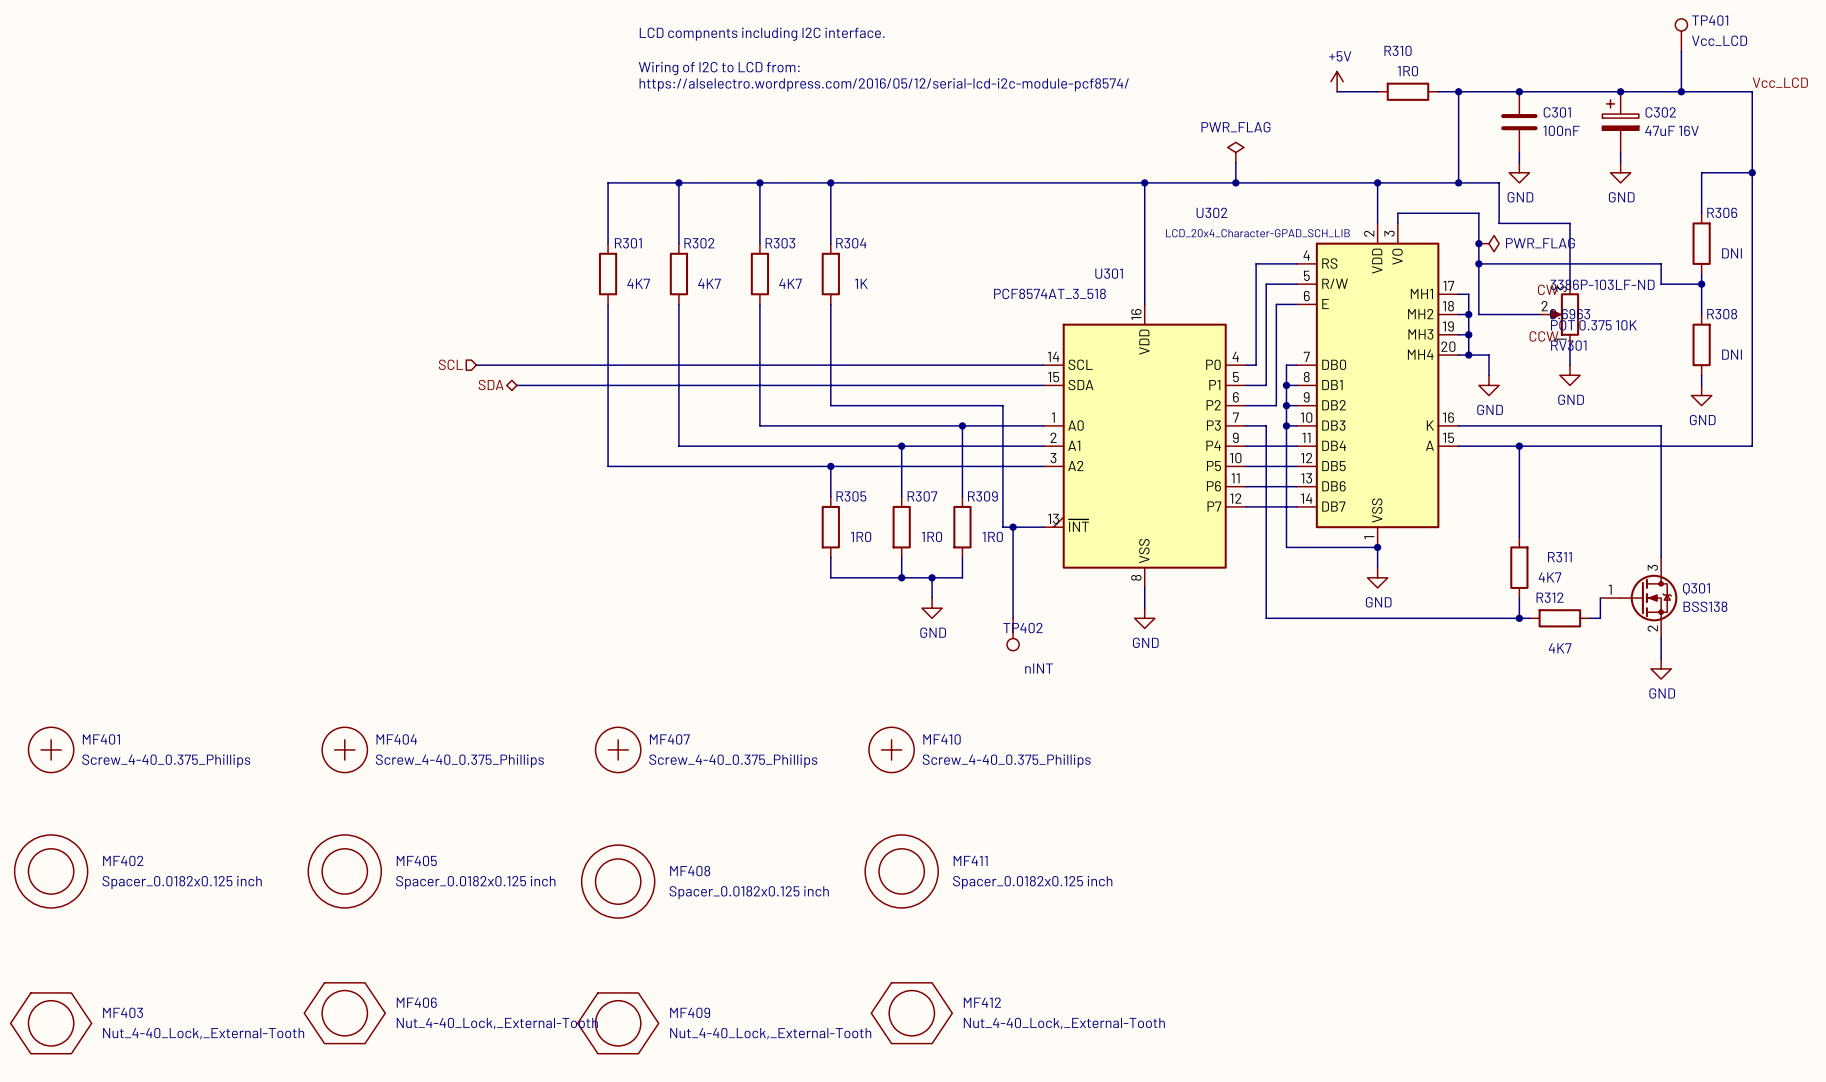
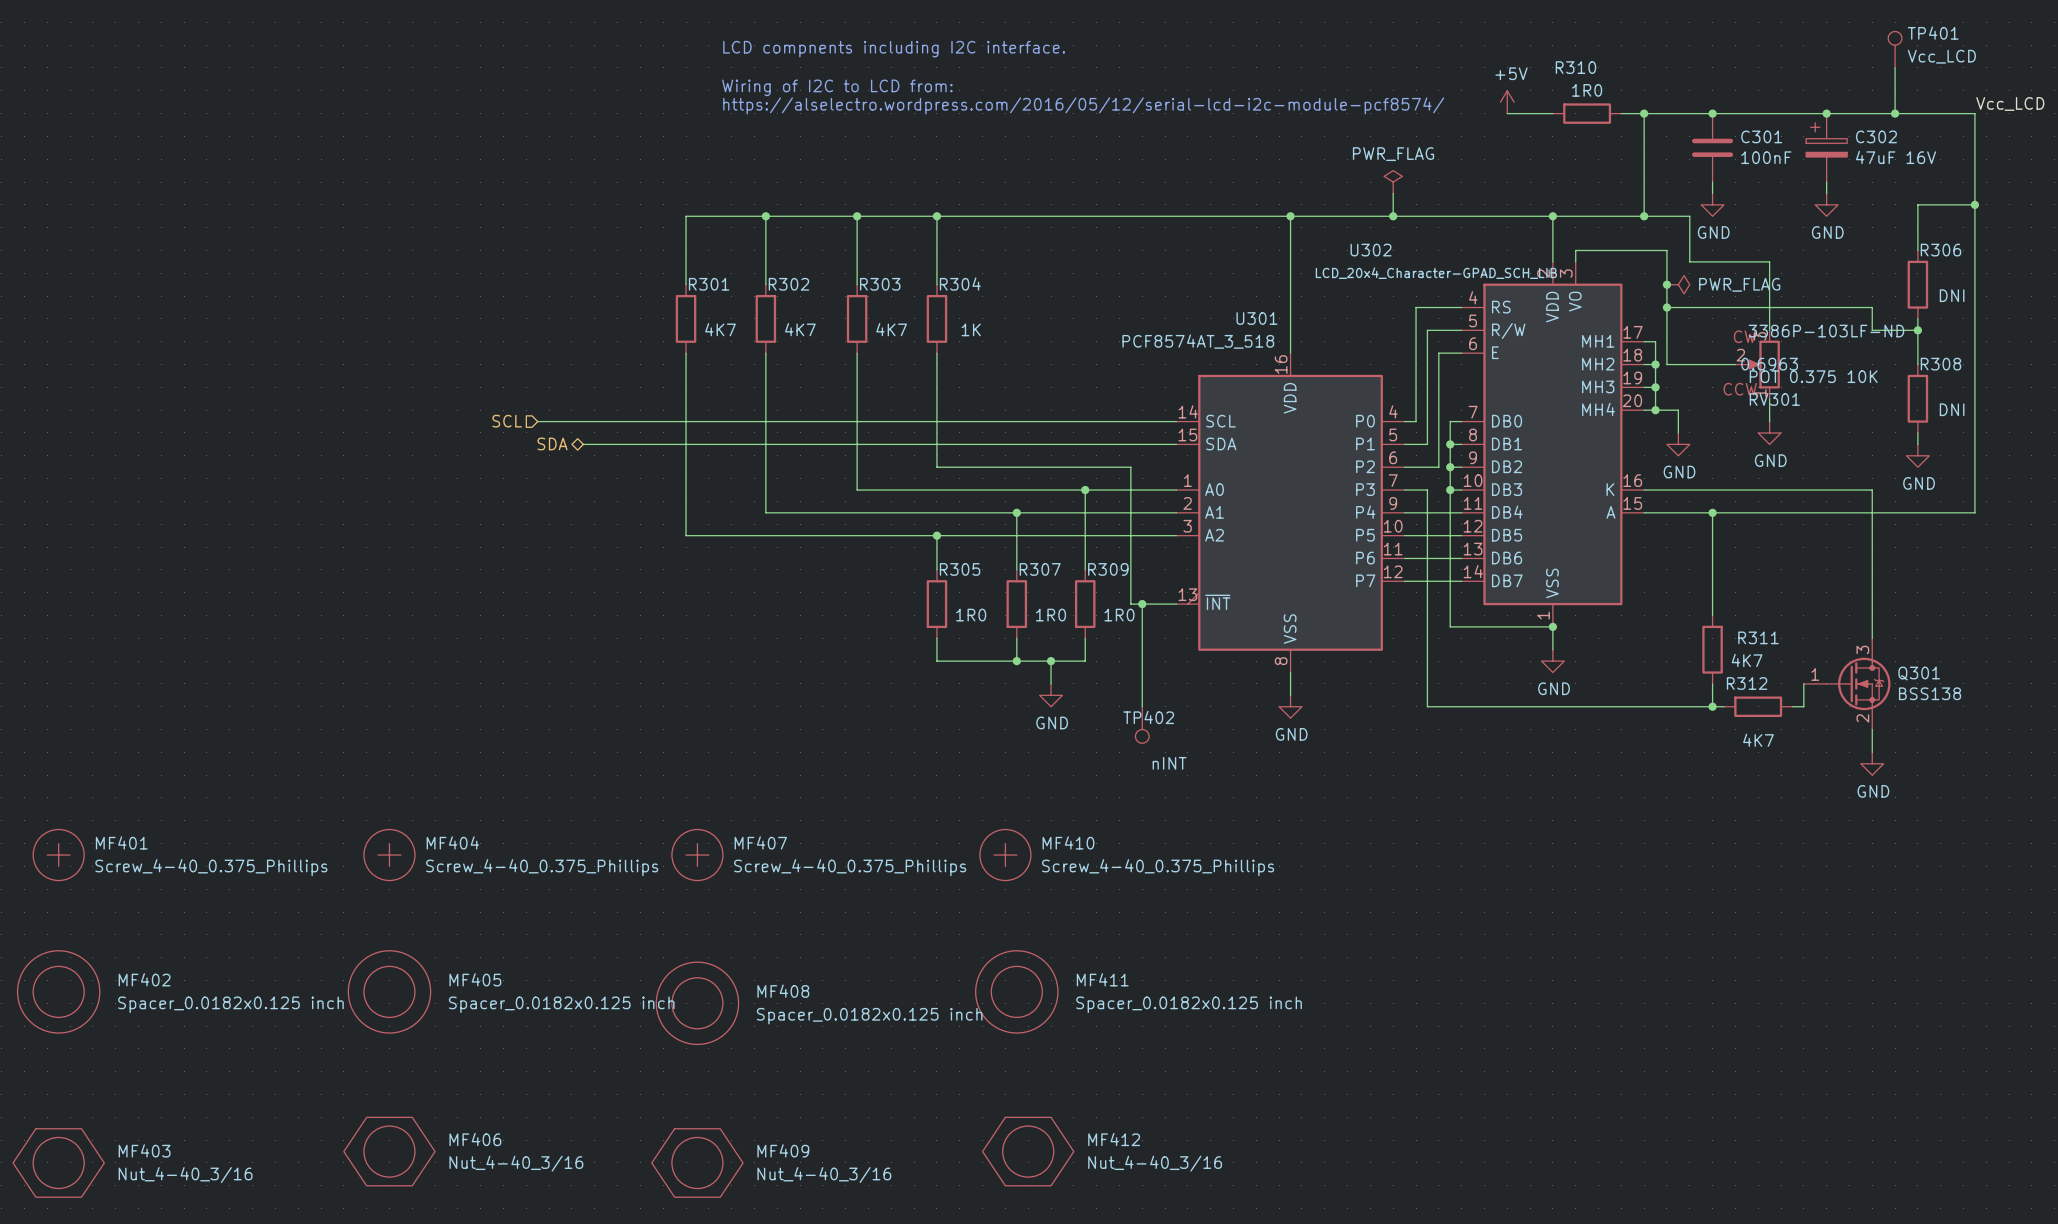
MF406 value: Nut_4-40_Lock,_External-Tooth (497, 1023) -> Nut_4-40_3/16 (516, 1163)
MF412 value: Nut_4-40_Lock,_External-Tooth (1064, 1023) -> Nut_4-40_3/16 (1155, 1163)
MF403 value: Nut_4-40_Lock,_External-Tooth (203, 1033) -> Nut_4-40_3/16 (185, 1175)
MF409 value: Nut_4-40_Lock,_External-Tooth (770, 1033) -> Nut_4-40_3/16 (824, 1175)

